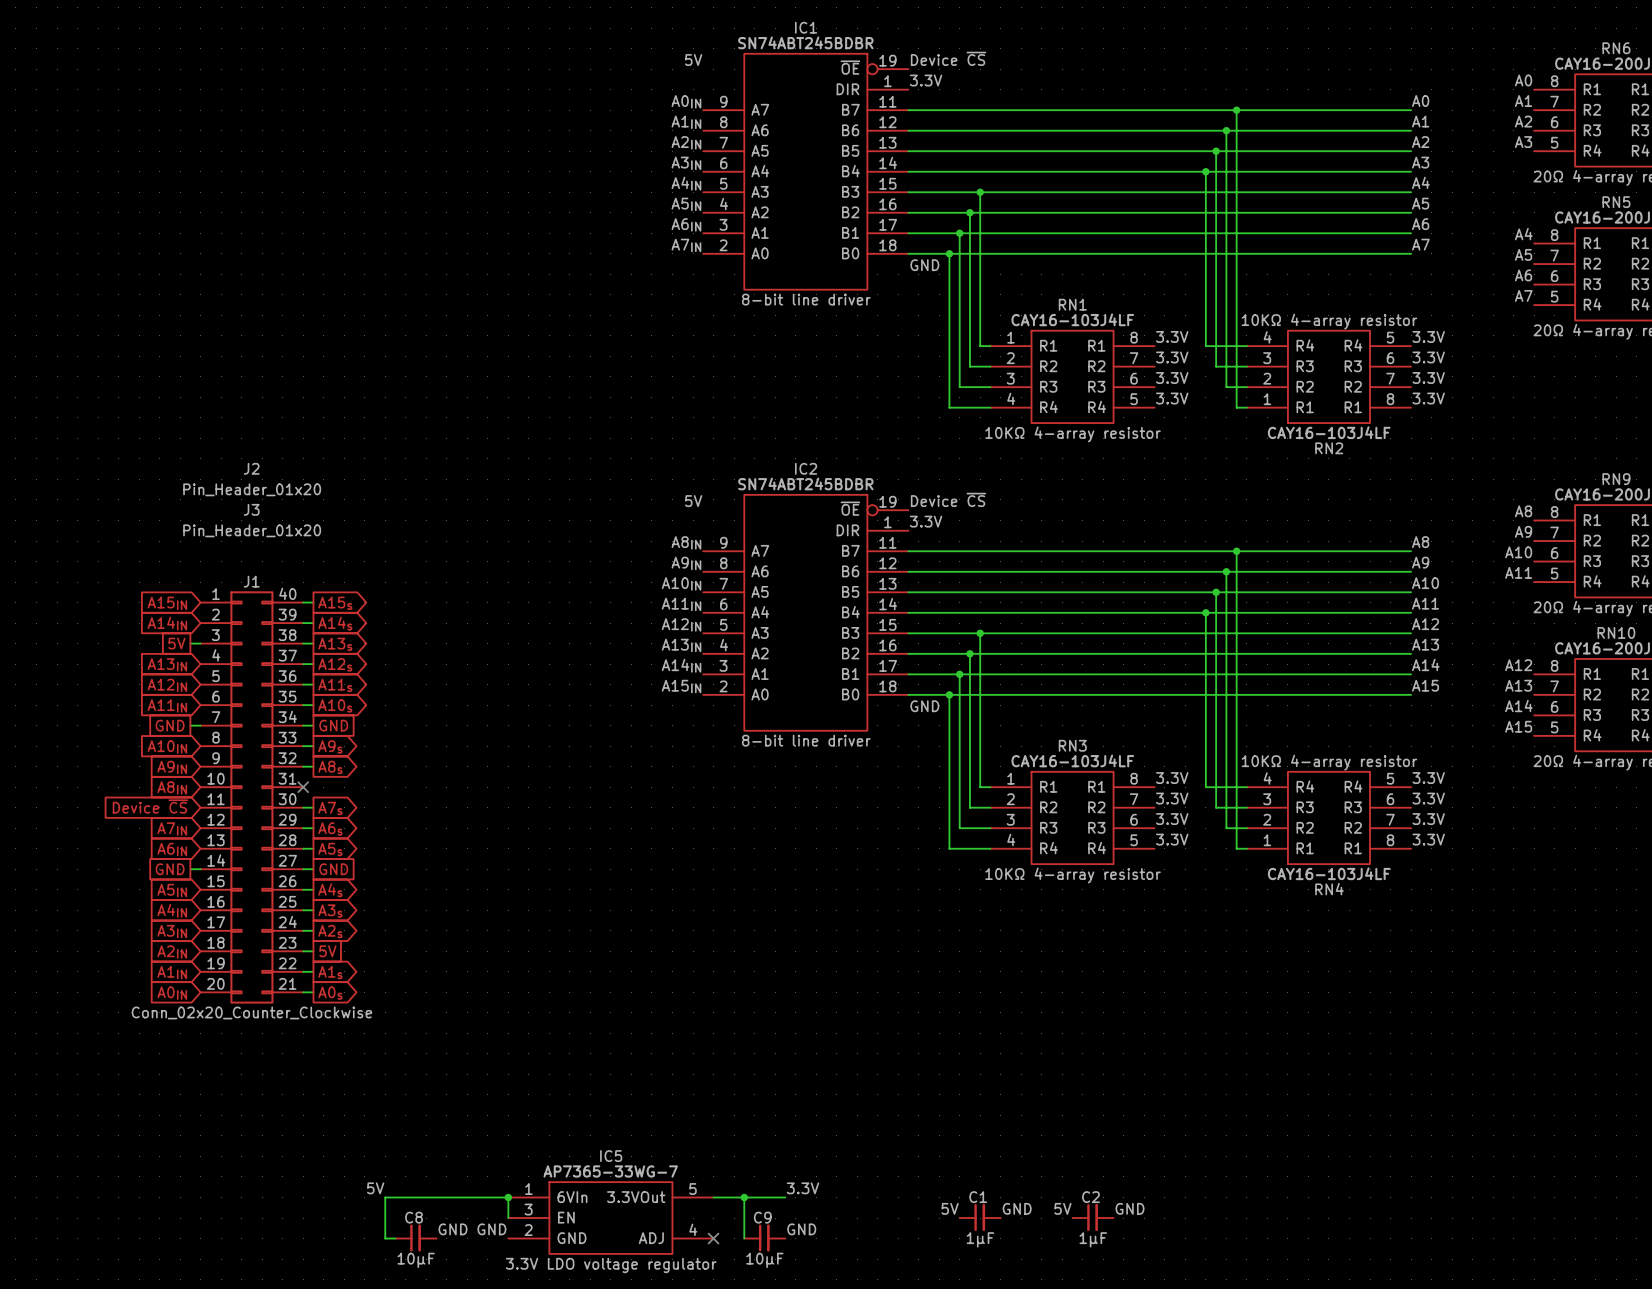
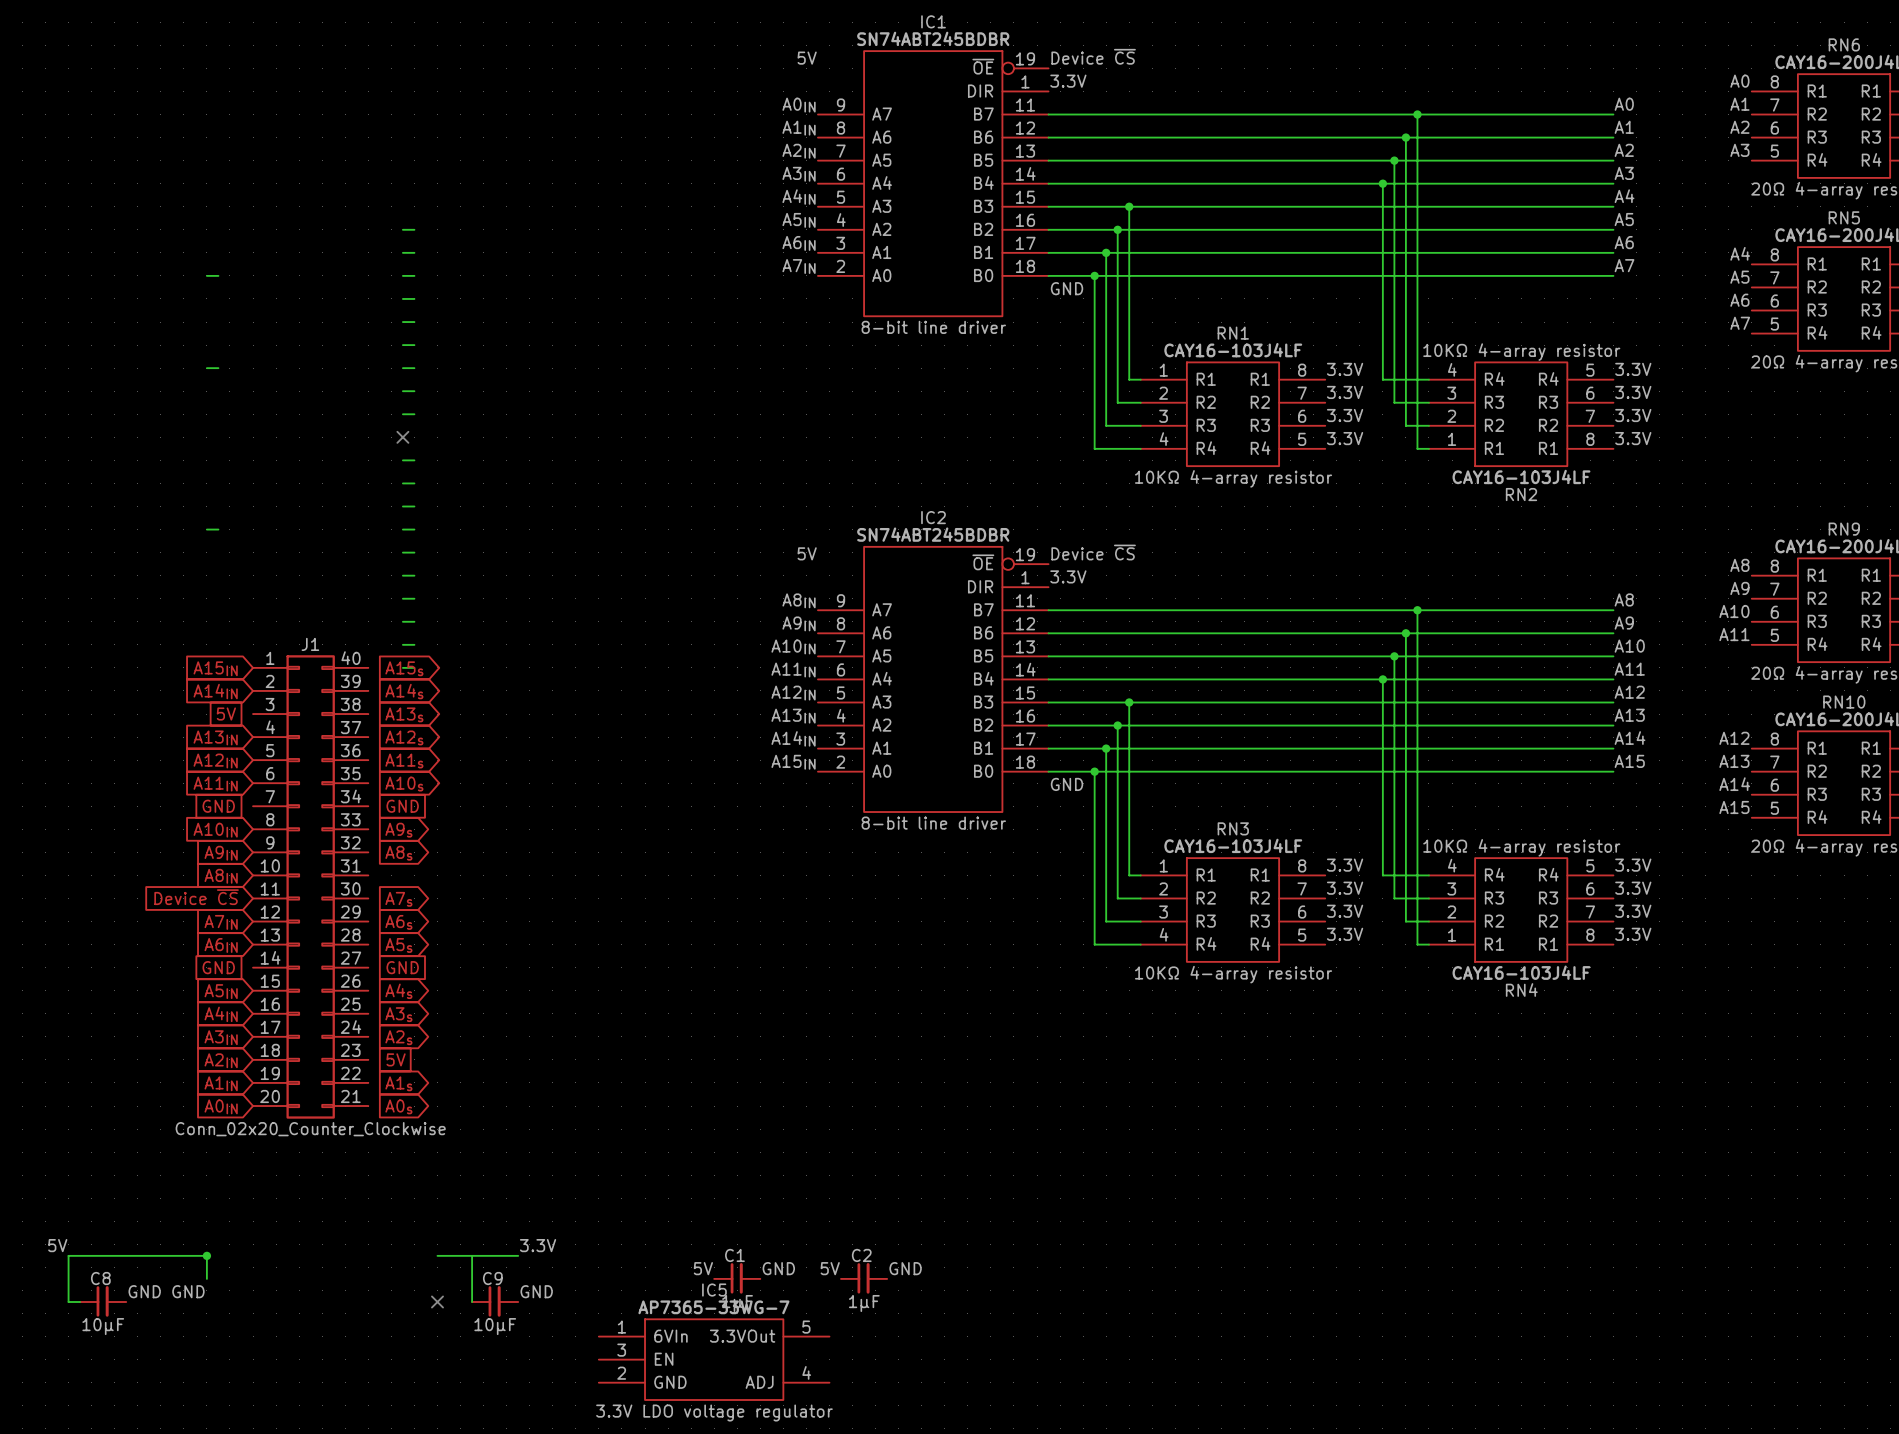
wire: none -> (402, 229) (414, 229)
wire: none -> (402, 252) (414, 252)
wire: none -> (206, 275) (218, 275)
wire: none -> (402, 275) (414, 275)
wire: none -> (402, 298) (414, 298)
wire: none -> (402, 322) (414, 322)
wire: none -> (402, 345) (414, 345)
wire: none -> (206, 368) (218, 368)
wire: none -> (402, 368) (414, 368)
wire: none -> (402, 391) (414, 391)
wire: none -> (402, 414) (414, 414)
no-connect mark: none -> (402, 437)
wire: none -> (402, 460) (414, 460)
J2: Pin_Header_01x20 (252, 479) -> none
J3: Pin_Header_01x20 (252, 520) -> none
wire: (303, 602) (313, 602) -> (402, 483) (414, 483)
wire: (303, 623) (313, 623) -> (402, 506) (414, 506)
wire: (190, 643) (200, 643) -> (206, 529) (218, 529)
wire: (303, 643) (313, 643) -> (402, 529) (414, 529)
wire: (303, 664) (313, 664) -> (402, 552) (414, 552)
wire: (303, 684) (313, 684) -> (402, 575) (414, 575)
wire: (303, 705) (313, 705) -> (402, 598) (414, 598)
wire: (190, 725) (200, 725) -> none
wire: (303, 725) (313, 725) -> (402, 621) (414, 621)
wire: (303, 746) (313, 746) -> (402, 644) (414, 644)
wire: (303, 766) (313, 766) -> (402, 667) (414, 667)
no-connect mark: (303, 787) -> none
wire: (303, 807) (313, 807) -> none
wire: (303, 828) (313, 828) -> none
wire: (303, 848) (313, 848) -> none
wire: (190, 869) (200, 869) -> none
wire: (303, 869) (313, 869) -> none
wire: (303, 889) (313, 889) -> none
wire: (303, 910) (313, 910) -> none
wire: (303, 930) (313, 930) -> none
wire: (303, 951) (313, 951) -> none
wire: (303, 971) (313, 971) -> none
wire: (303, 992) (313, 992) -> none
label: none -> 5V (57, 1245)
label: none -> 3.3V (538, 1245)
junction: none -> (206, 1255)
wire: none -> (437, 1255) (518, 1255)
wire: none -> (472, 1255) (472, 1301)
label: none -> 5V (703, 1268)
label: none -> GND (778, 1268)
label: none -> 5V (830, 1268)
label: none -> GND (905, 1268)
wire: none -> (206, 1278) (206, 1255) (68, 1255) (68, 1301) (80, 1301)
label: none -> GND (144, 1291)
label: none -> GND (188, 1291)
label: none -> GND (536, 1291)
no-connect mark: none -> (437, 1301)
label: 5V (375, 1188) -> none
label: 3.3V (802, 1188) -> none
junction: (508, 1197) -> none
wire: (713, 1197) (785, 1197) -> none
wire: (744, 1197) (744, 1238) -> none
junction: (744, 1197) -> none
label: 5V (950, 1208) -> none
label: GND (1017, 1208) -> none
label: 5V (1062, 1208) -> none
label: GND (1130, 1208) -> none
C1 position: (980, 1217) -> (737, 1278)
C2 position: (1093, 1217) -> (864, 1278)
wire: (508, 1218) (508, 1197) (385, 1197) (385, 1238) (395, 1238) -> none
label: GND (453, 1229) -> none
label: GND (491, 1229) -> none
label: GND (801, 1229) -> none
C8 position: (416, 1238) -> (103, 1301)
no-connect mark: (713, 1238) -> none
C9 position: (764, 1238) -> (495, 1301)

